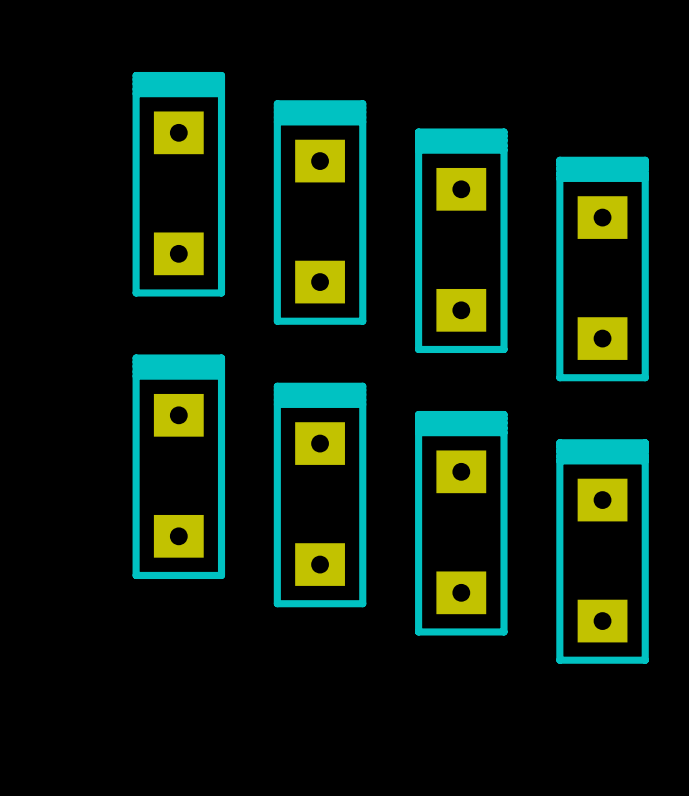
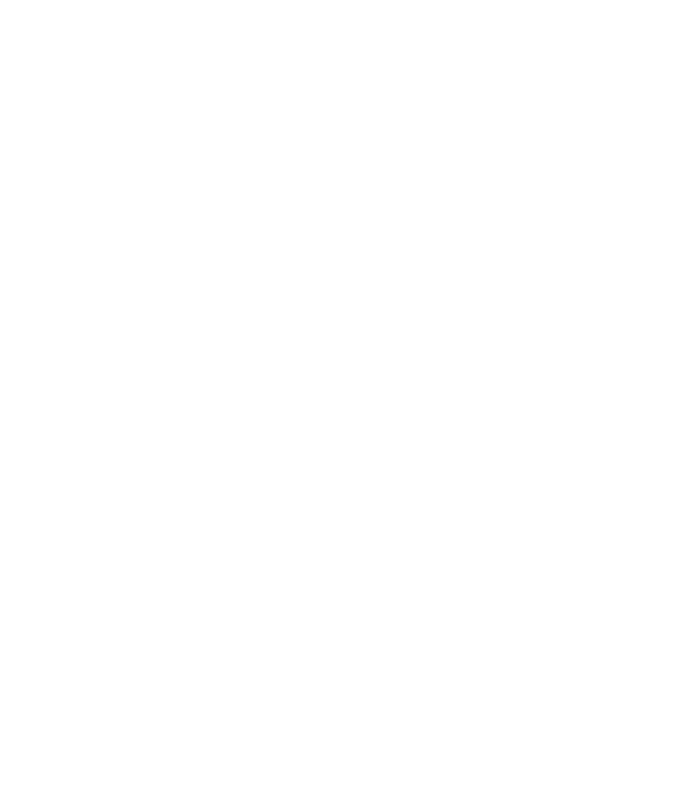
part: (178, 184) -> none
part: (320, 212) -> none
part: (461, 240) -> none
part: (602, 269) -> none
part: (178, 466) -> none
part: (320, 494) -> none
part: (461, 523) -> none
part: (602, 551) -> none

